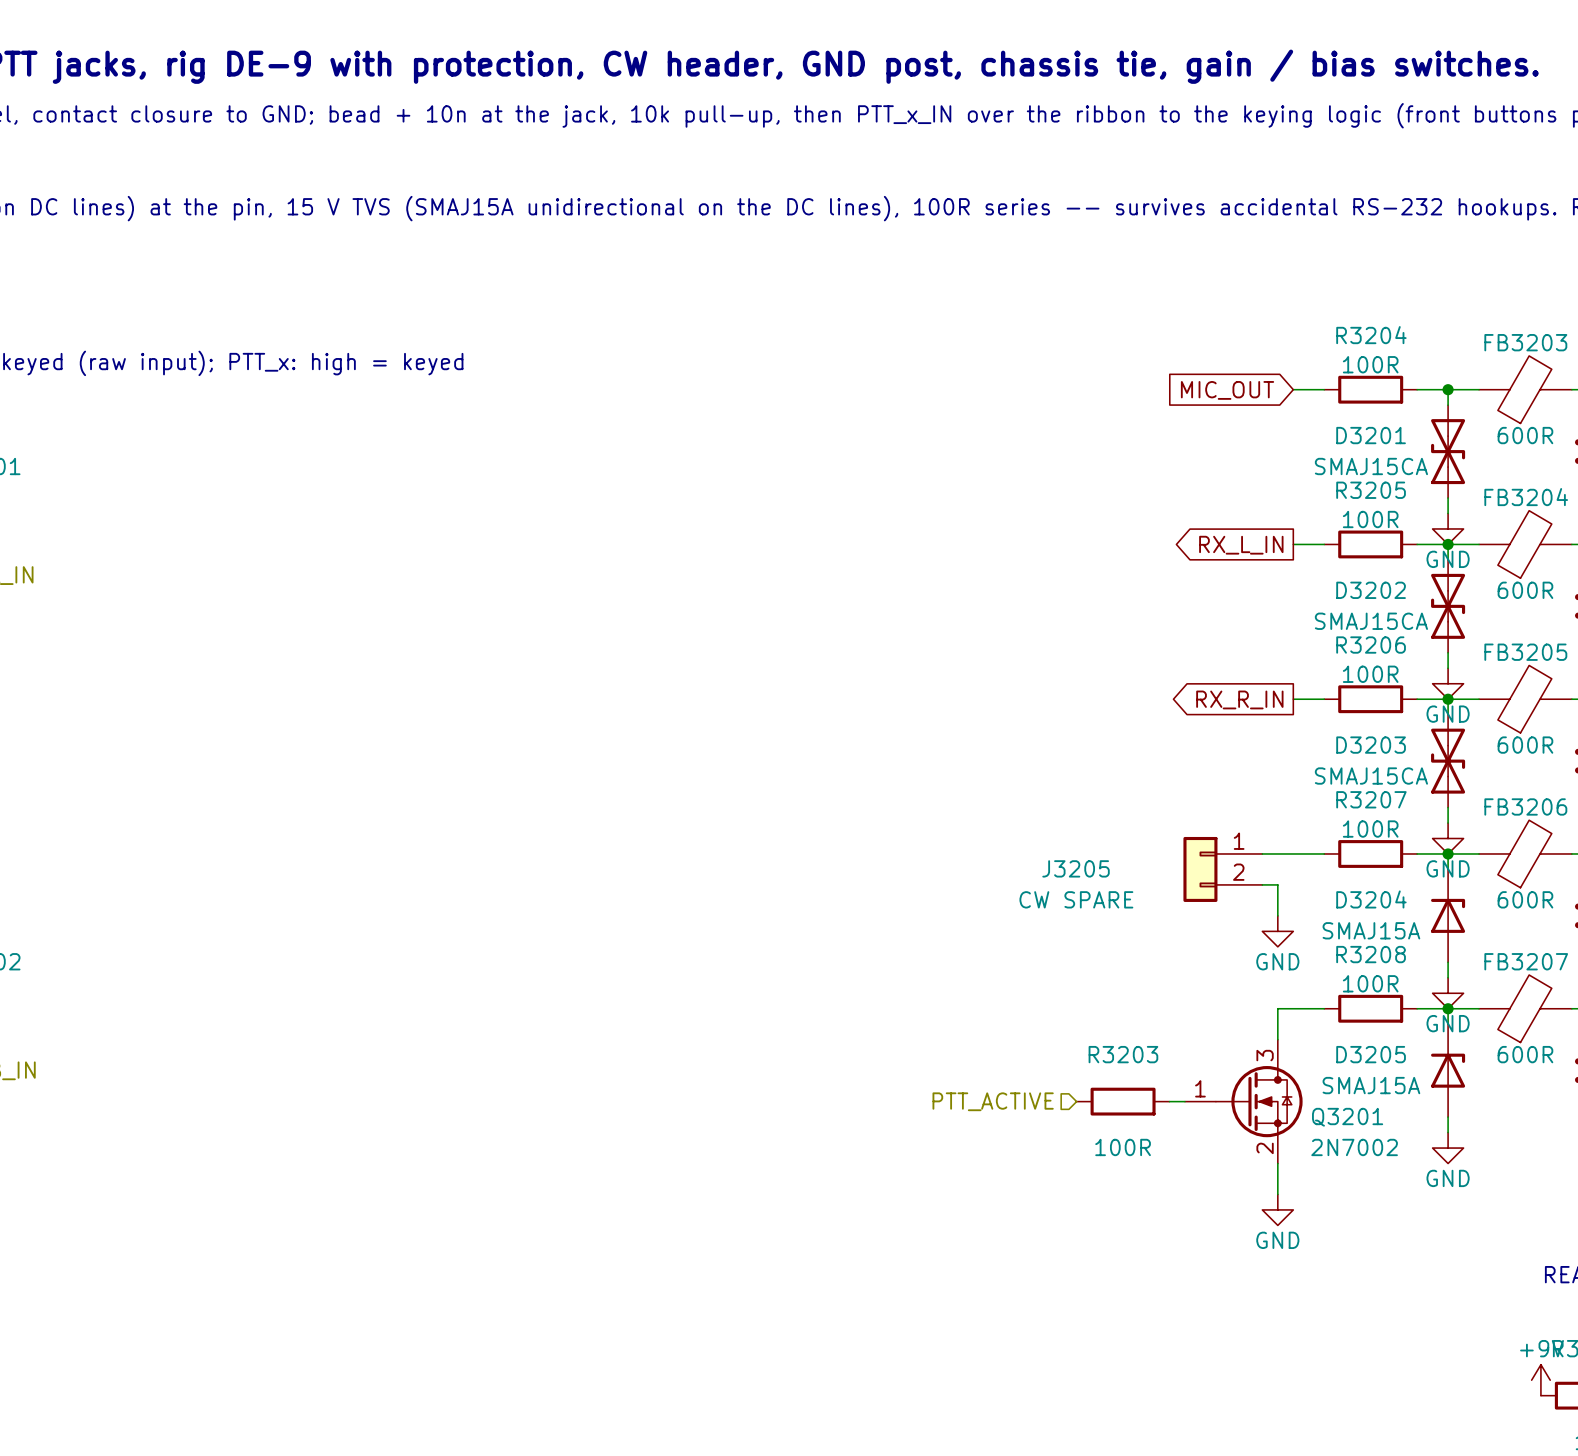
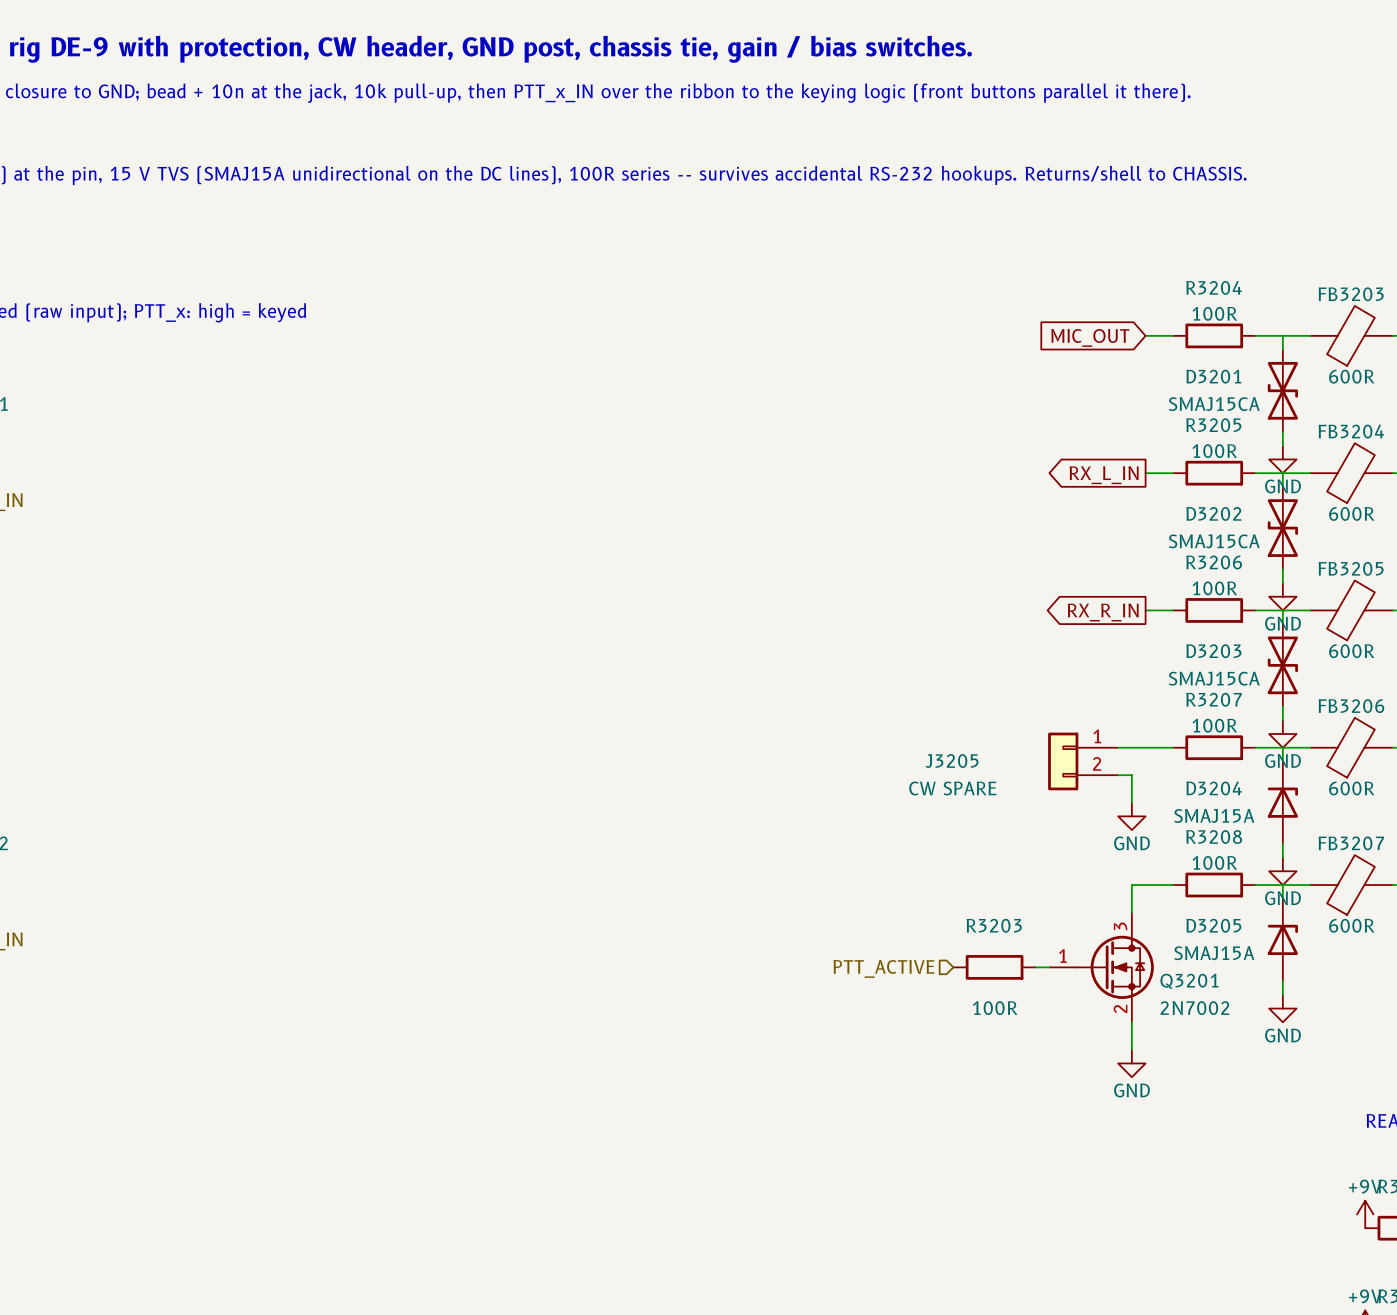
junction: (1448, 389) -> none
junction: (1448, 544) -> none
junction: (1448, 699) -> none
junction: (1448, 853) -> none
junction: (1448, 1008) -> none

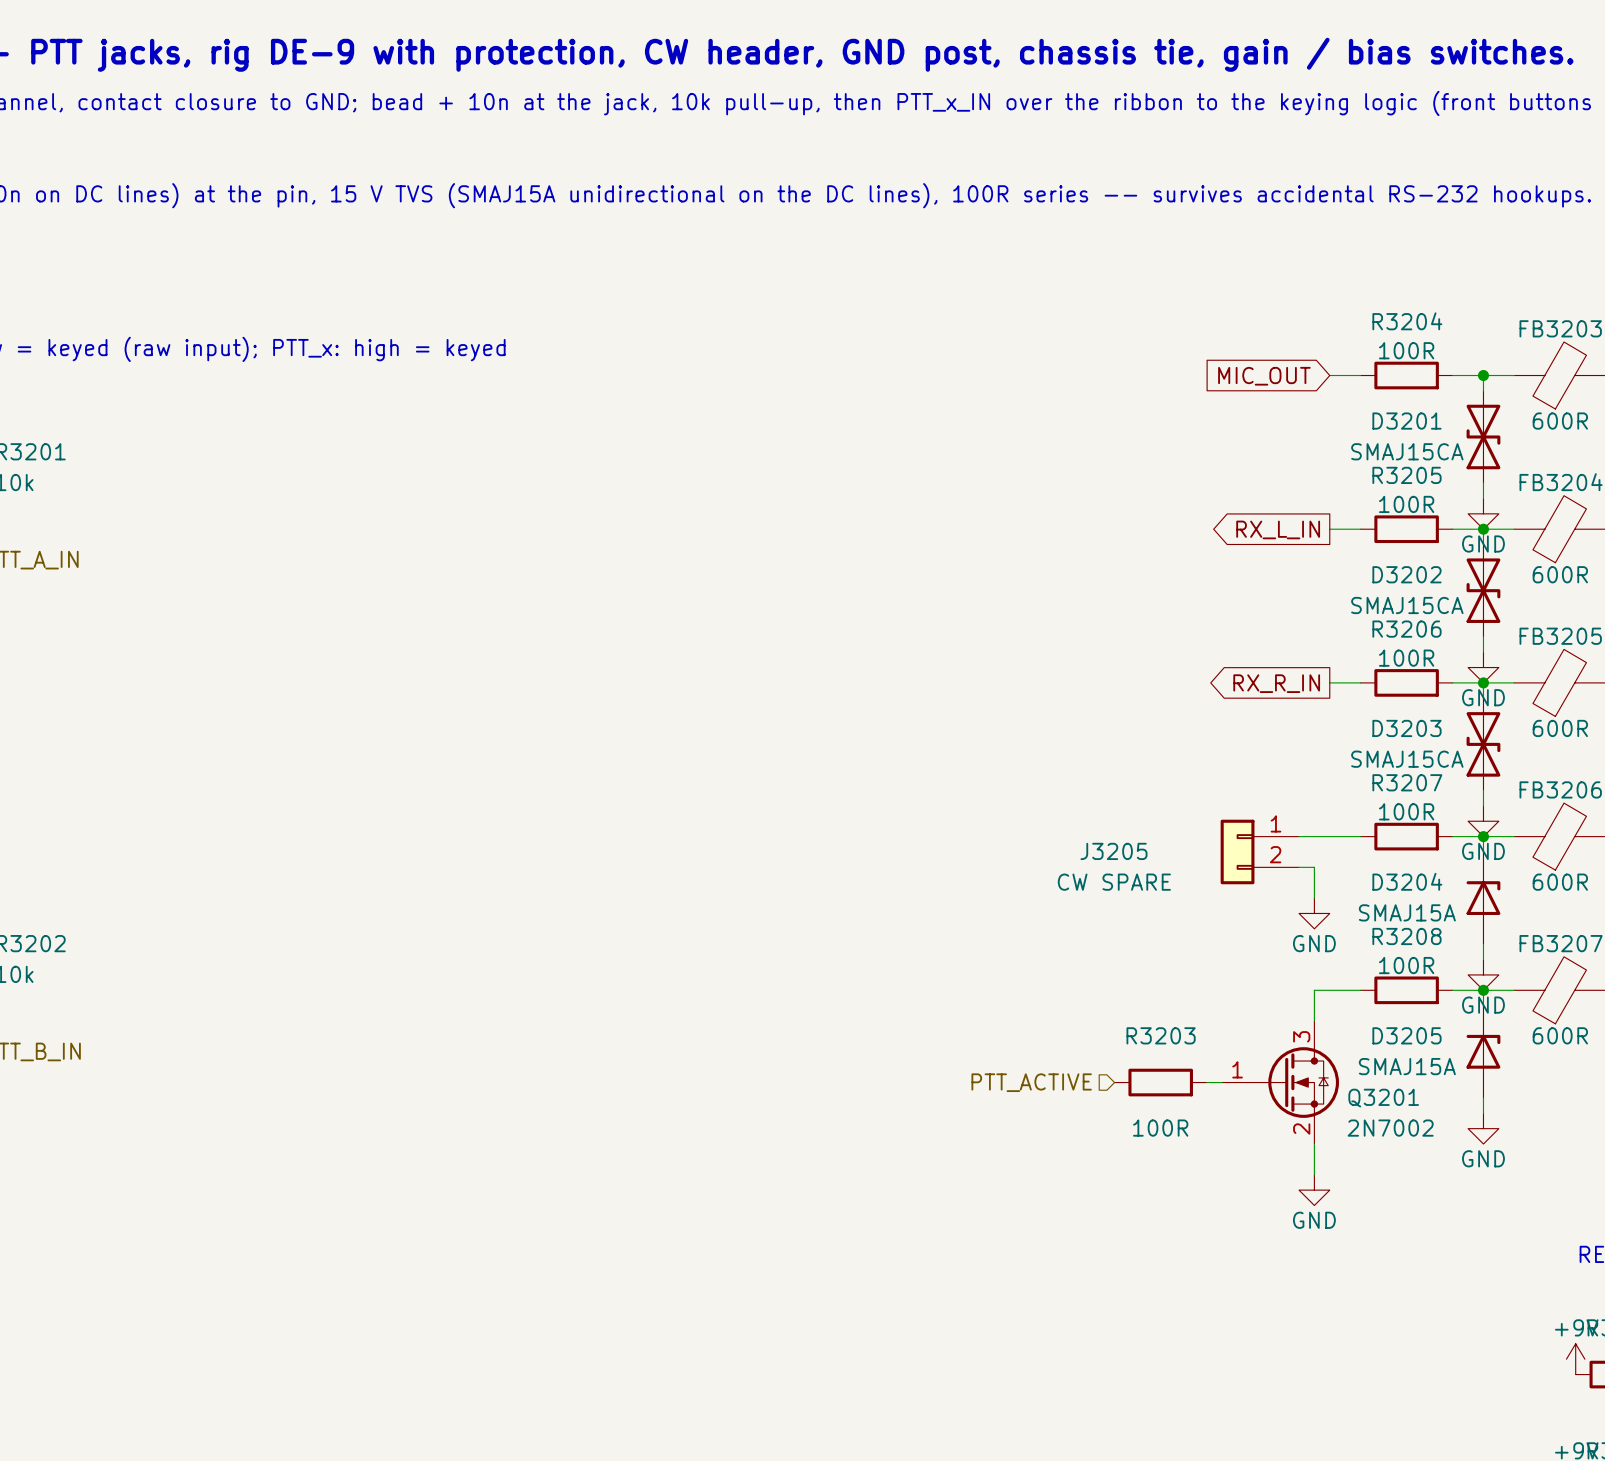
junction: none -> (1483, 375)
junction: none -> (1483, 529)
junction: none -> (1483, 682)
junction: none -> (1483, 836)
junction: none -> (1483, 990)

